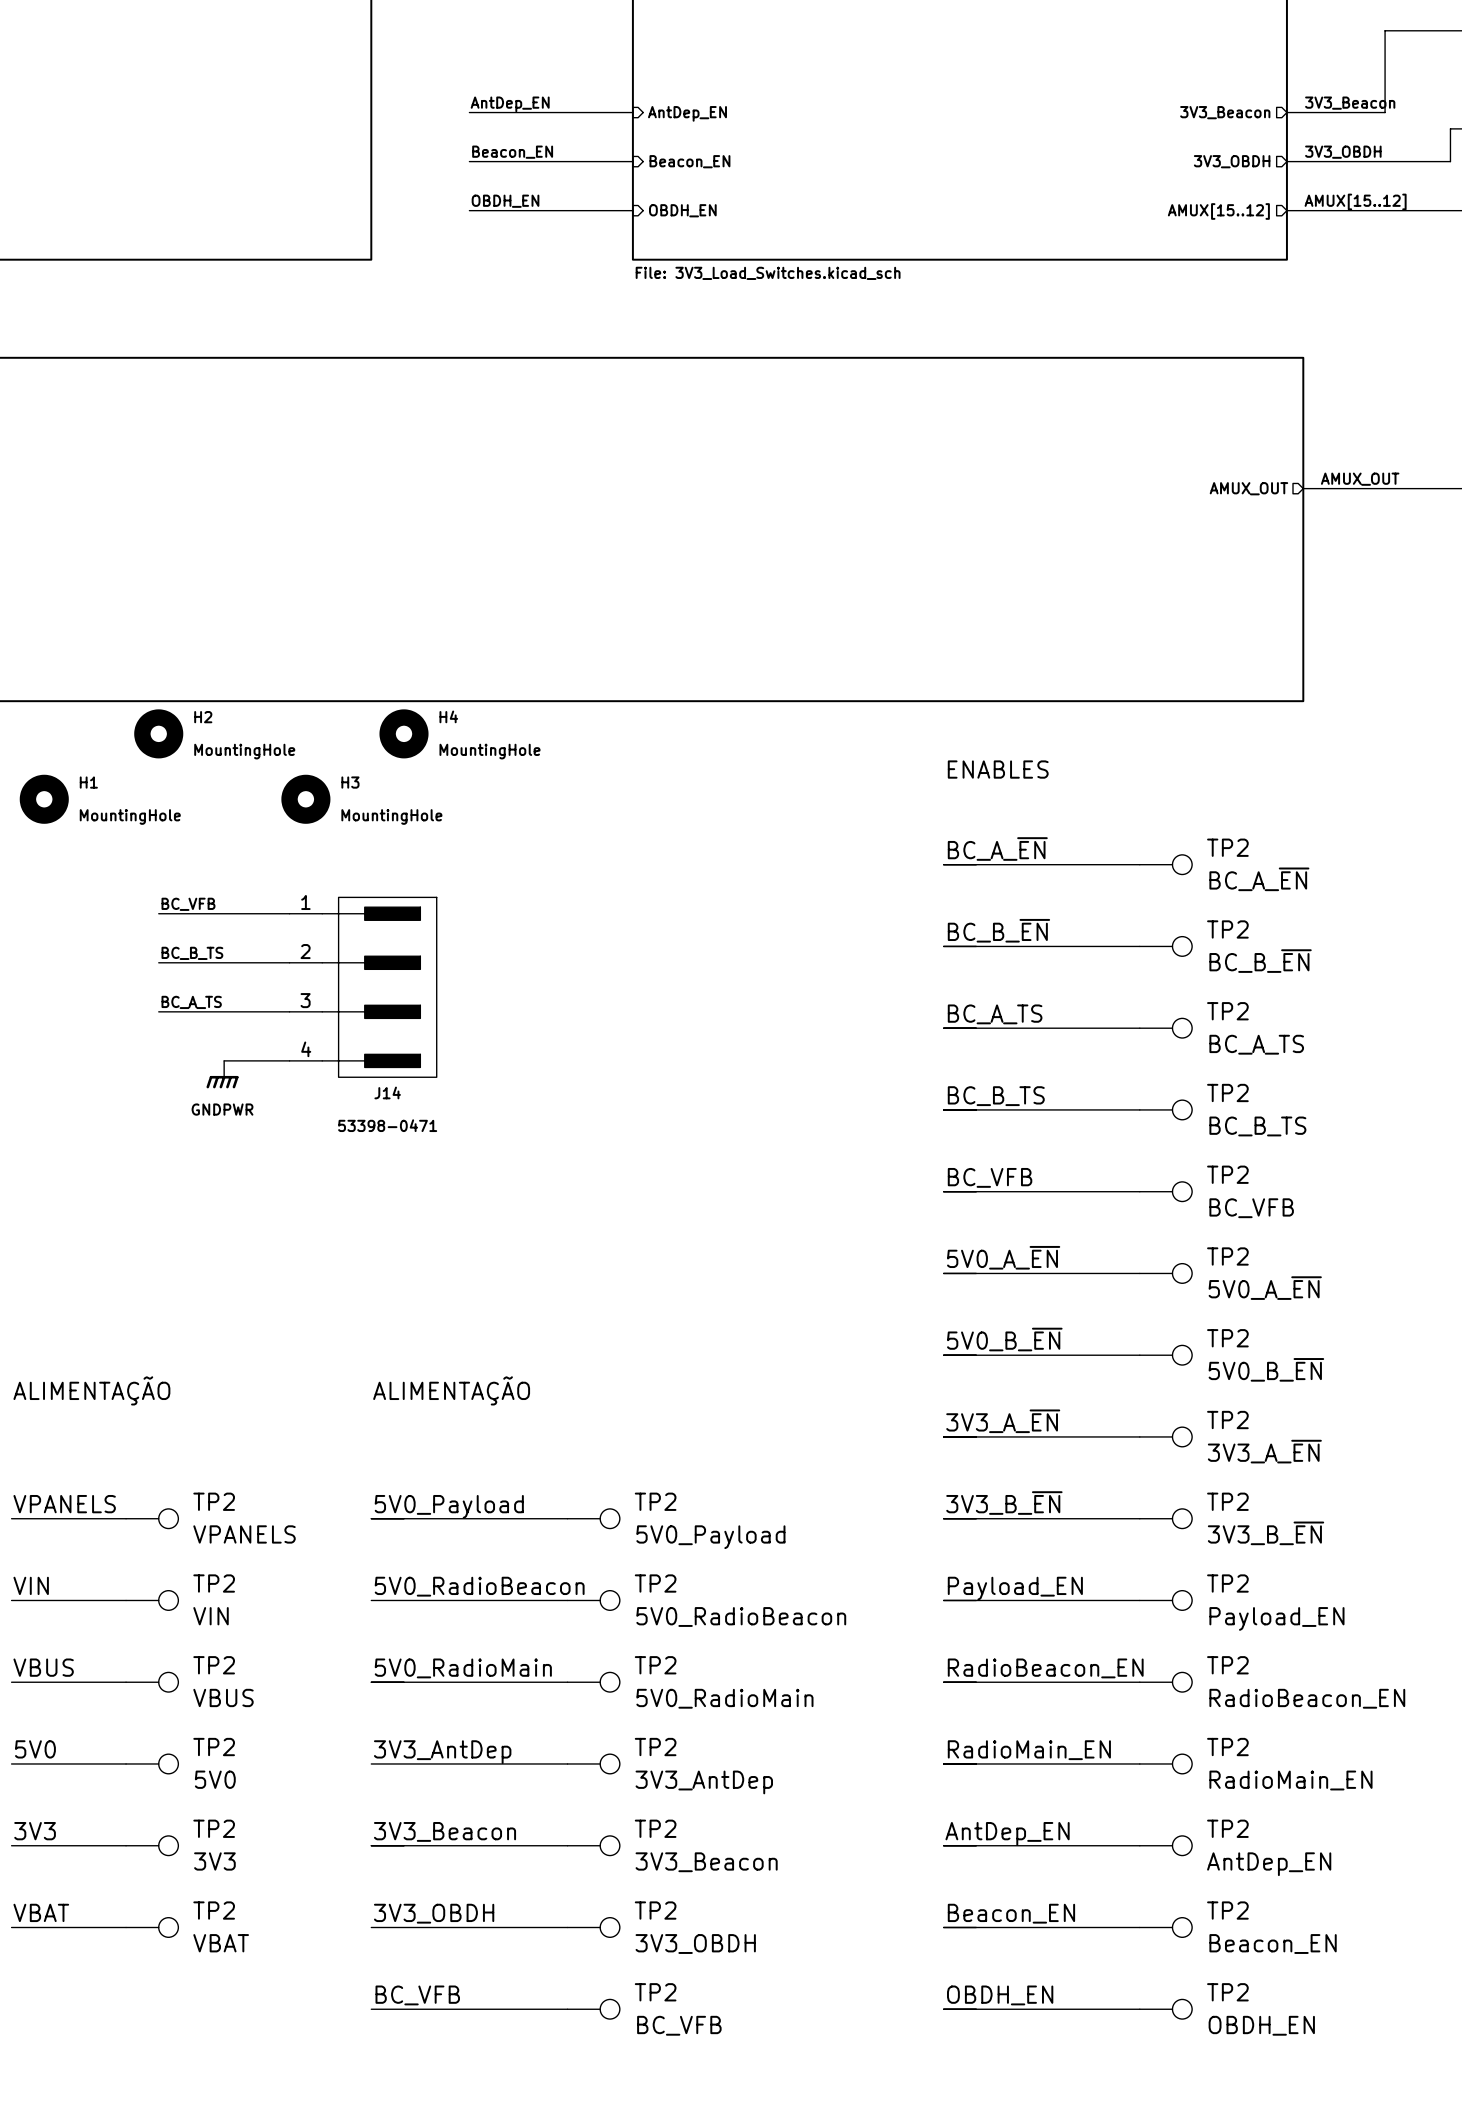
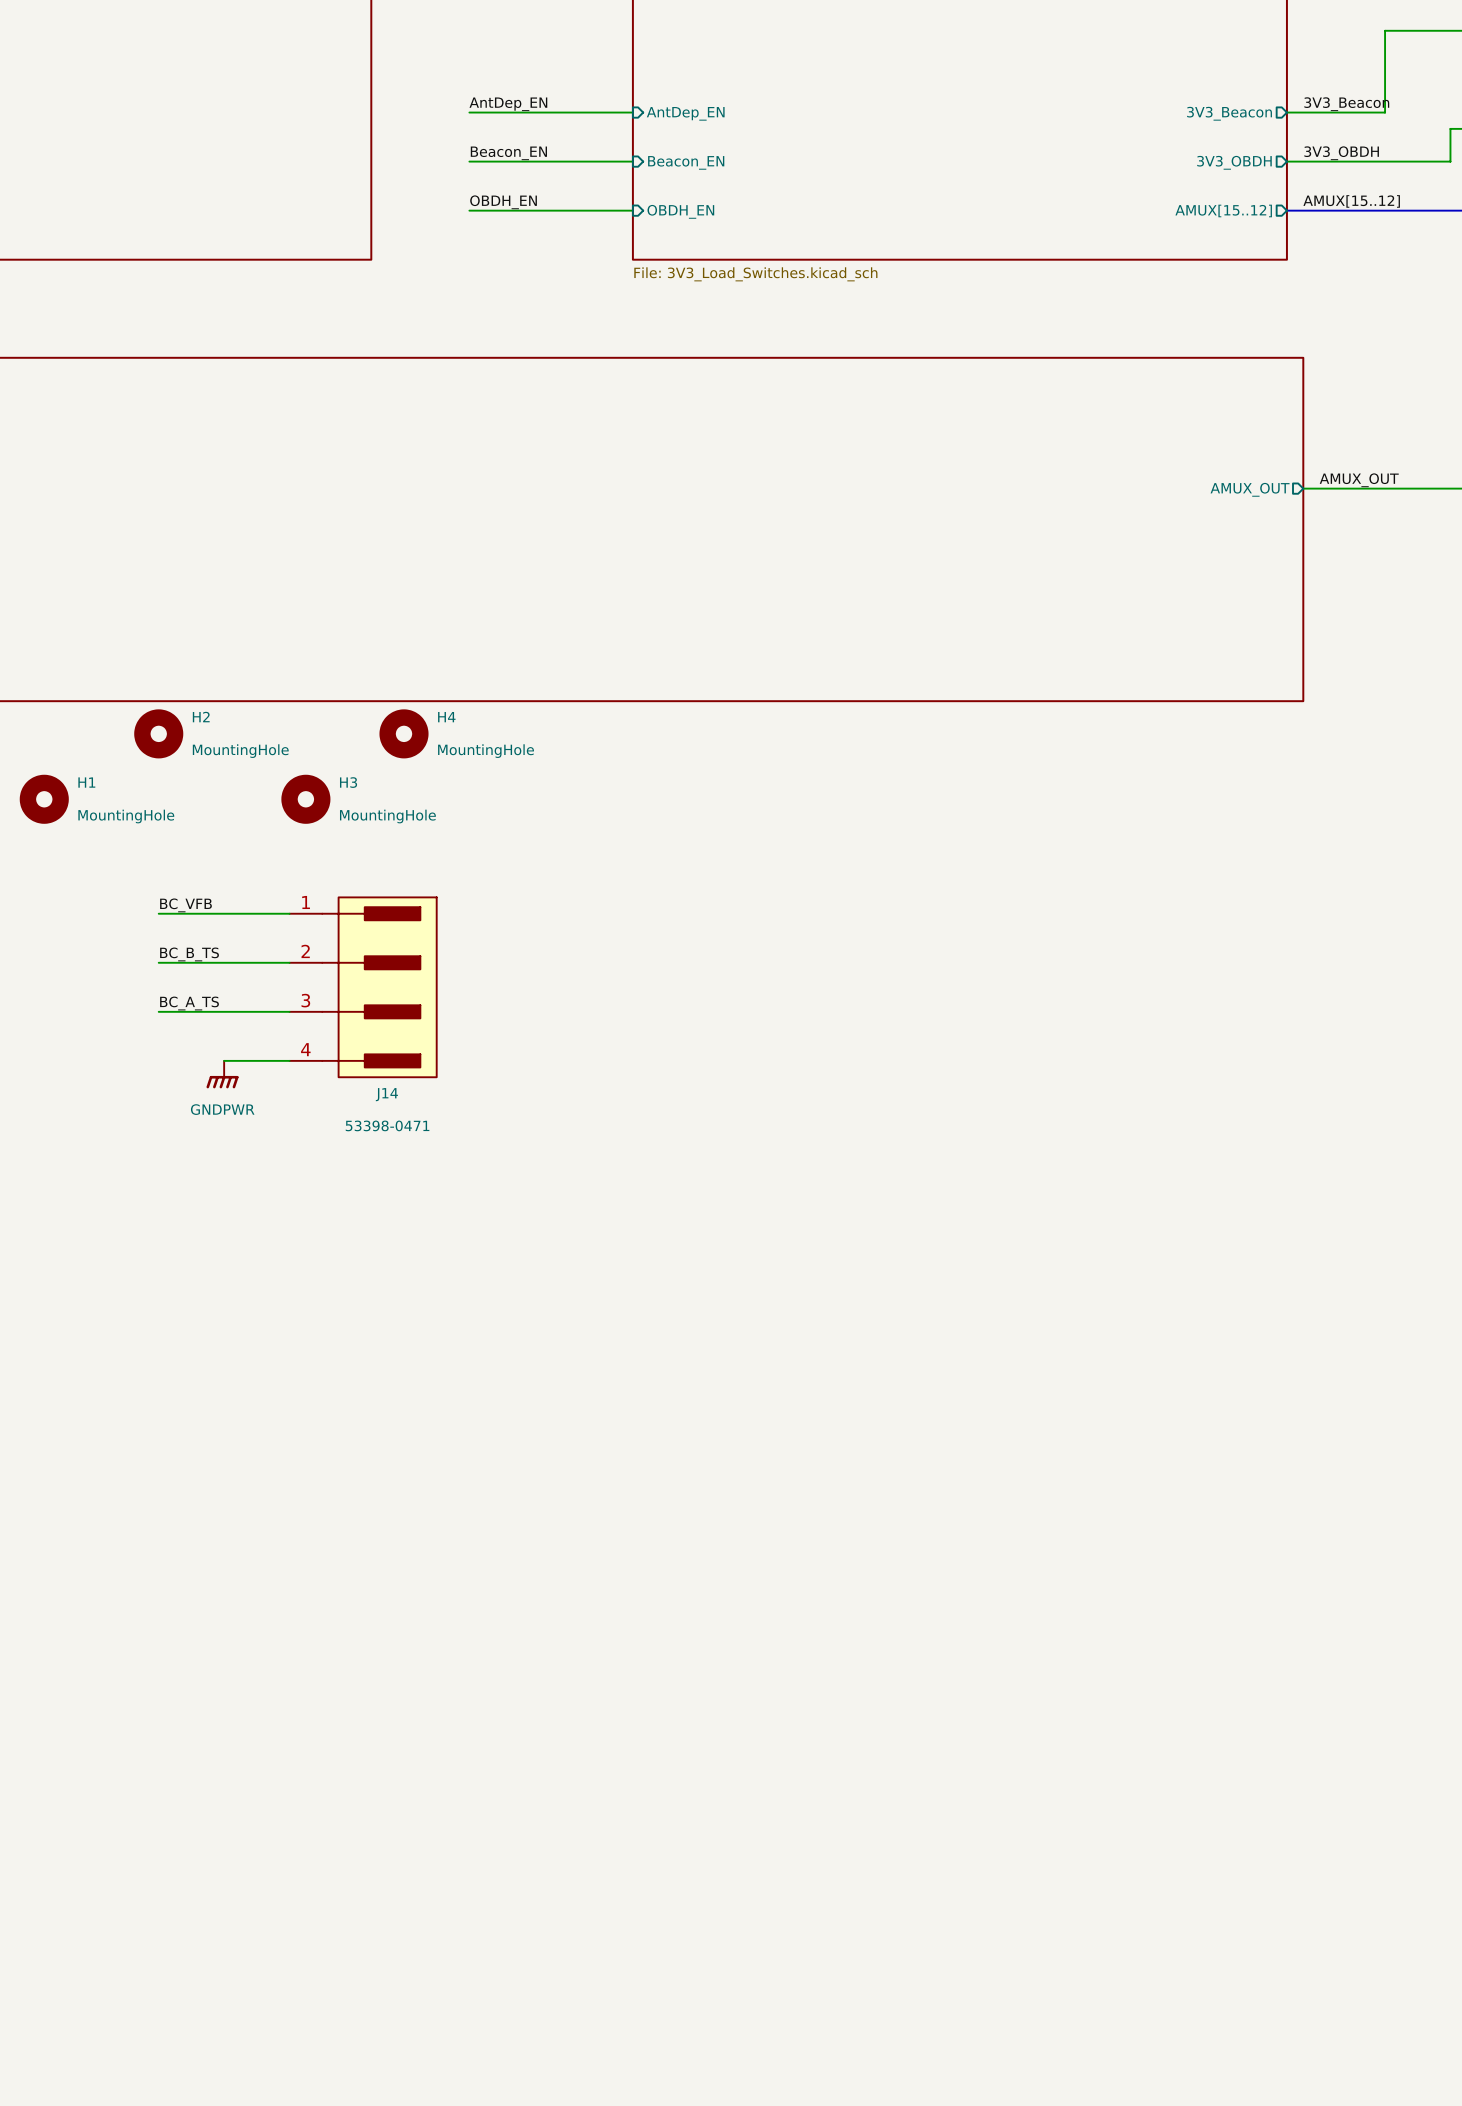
text: ENABLES (998, 769) -> none
label: BC_A_~{EN} (997, 848) -> none
wire: (943, 864) (1139, 864) -> none
TP2: BC_A_~{EN} (1165, 864) -> none
label: BC_B_~{EN} (998, 930) -> none
wire: (943, 946) (1139, 946) -> none
TP2: BC_B_~{EN} (1165, 946) -> none
label: BC_A_TS (995, 1014) -> none
wire: (943, 1028) (1139, 1028) -> none
TP2: BC_A_TS (1165, 1028) -> none
label: BC_B_TS (996, 1096) -> none
wire: (943, 1109) (1139, 1109) -> none
TP2: BC_B_TS (1165, 1109) -> none
label: BC_VFB (990, 1177) -> none
wire: (943, 1191) (1139, 1191) -> none
TP2: BC_VFB (1165, 1191) -> none
label: 5V0_A_~{EN} (1003, 1257) -> none
wire: (943, 1273) (1139, 1273) -> none
TP2: 5V0_A_~{EN} (1165, 1273) -> none
label: 5V0_B_~{EN} (1004, 1339) -> none
wire: (943, 1355) (1139, 1355) -> none
TP2: 5V0_B_~{EN} (1165, 1355) -> none
text: ALIMENTAÇÃO (91, 1390) -> none
text: ALIMENTAÇÃO (451, 1390) -> none
label: 3V3_A_~{EN} (1003, 1421) -> none
wire: (943, 1436) (1139, 1436) -> none
TP2: 3V3_A_~{EN} (1165, 1436) -> none
label: 3V3_B_~{EN} (1004, 1503) -> none
label: VPANELS (64, 1504) -> none
label: 5V0_Payload (449, 1506) -> none
wire: (11, 1518) (126, 1518) -> none
TP2: VPANELS (152, 1518) -> none
wire: (371, 1518) (567, 1518) -> none
TP2: 5V0_Payload (593, 1518) -> none
wire: (943, 1518) (1139, 1518) -> none
TP2: 3V3_B_~{EN} (1165, 1518) -> none
label: VIN (31, 1585) -> none
label: 5V0_RadioBeacon (479, 1586) -> none
label: Payload_EN (1015, 1588) -> none
wire: (11, 1600) (126, 1600) -> none
TP2: VIN (152, 1600) -> none
wire: (371, 1600) (567, 1600) -> none
TP2: 5V0_RadioBeacon (593, 1600) -> none
wire: (943, 1600) (1139, 1600) -> none
TP2: Payload_EN (1165, 1600) -> none
label: VBUS (43, 1667) -> none
label: 5V0_RadioMain (463, 1668) -> none
label: RadioBeacon_EN (1045, 1668) -> none
wire: (11, 1682) (126, 1682) -> none
TP2: VBUS (152, 1682) -> none
wire: (371, 1682) (567, 1682) -> none
TP2: 5V0_RadioMain (593, 1682) -> none
wire: (943, 1682) (1139, 1682) -> none
TP2: RadioBeacon_EN (1165, 1682) -> none
label: 5V0 (35, 1749) -> none
label: RadioMain_EN (1029, 1750) -> none
label: 3V3_AntDep (442, 1752) -> none
wire: (11, 1763) (126, 1763) -> none
TP2: 5V0 (152, 1763) -> none
wire: (371, 1763) (567, 1763) -> none
TP2: 3V3_AntDep (593, 1763) -> none
wire: (943, 1763) (1139, 1763) -> none
TP2: RadioMain_EN (1165, 1763) -> none
label: 3V3 (35, 1831) -> none
label: 3V3_Beacon (445, 1831) -> none
label: AntDep_EN (1007, 1833) -> none
wire: (11, 1845) (126, 1845) -> none
TP2: 3V3 (152, 1845) -> none
wire: (371, 1845) (567, 1845) -> none
TP2: 3V3_Beacon (593, 1845) -> none
wire: (943, 1845) (1139, 1845) -> none
TP2: AntDep_EN (1165, 1845) -> none
label: VBAT (41, 1912) -> none
label: 3V3_OBDH (434, 1913) -> none
label: Beacon_EN (1011, 1913) -> none
wire: (11, 1927) (126, 1927) -> none
TP2: VBAT (152, 1927) -> none
wire: (371, 1927) (567, 1927) -> none
TP2: 3V3_OBDH (593, 1927) -> none
wire: (943, 1927) (1139, 1927) -> none
TP2: Beacon_EN (1165, 1927) -> none
label: BC_VFB (417, 1995) -> none
label: OBDH_EN (1000, 1995) -> none
wire: (371, 2009) (567, 2009) -> none
TP2: BC_VFB (593, 2009) -> none
wire: (943, 2009) (1139, 2009) -> none
TP2: OBDH_EN (1165, 2009) -> none

